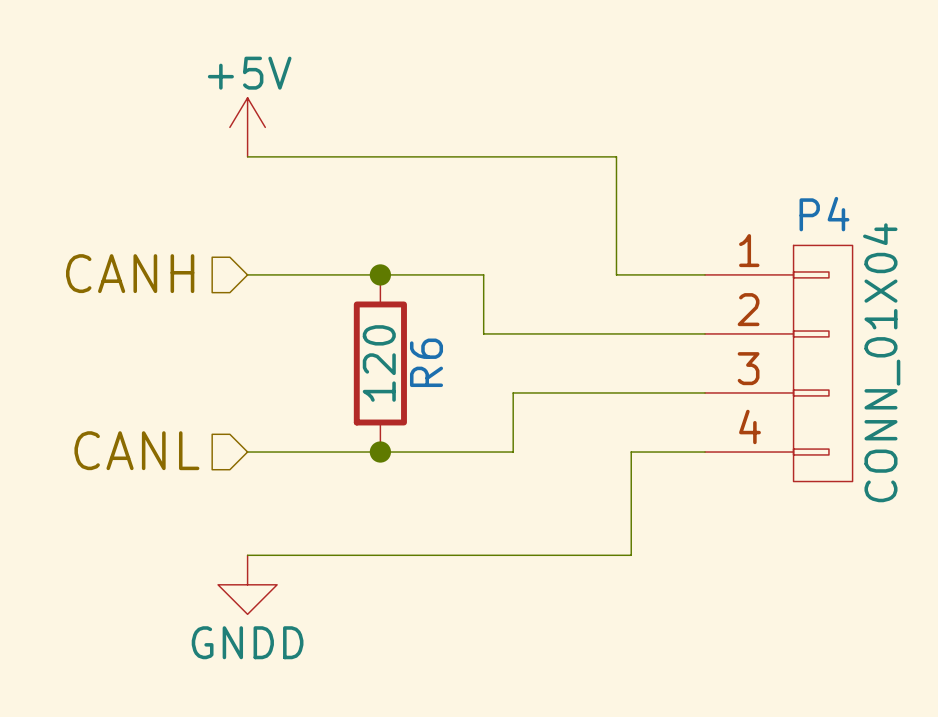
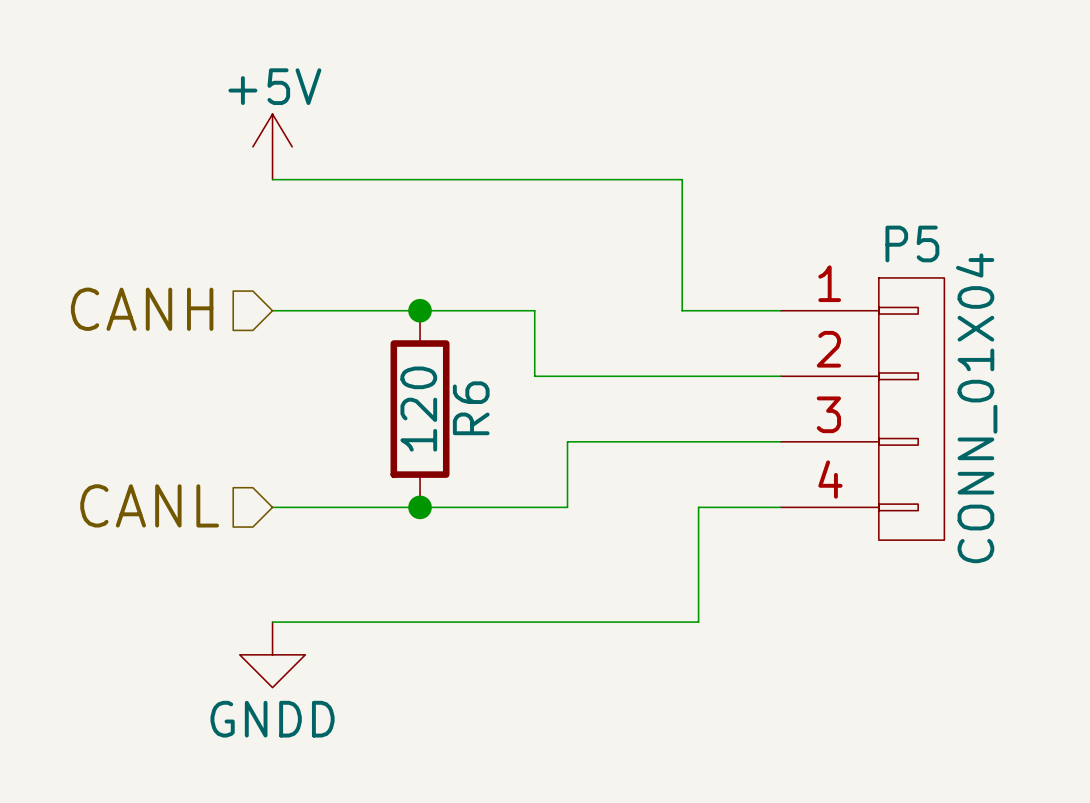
P4 name: P4 (824, 214) -> P5 (912, 243)

